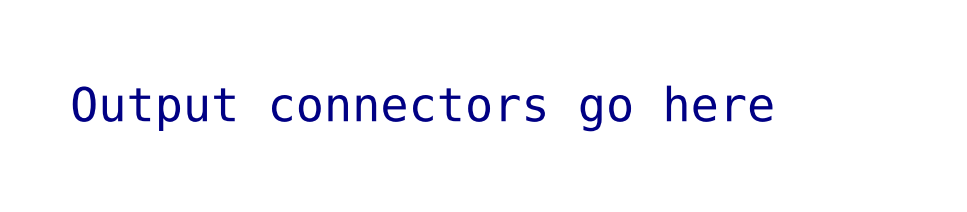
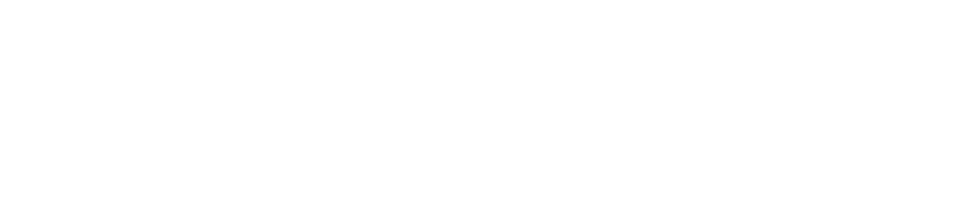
text: Output connectors go here (422, 108) -> none

